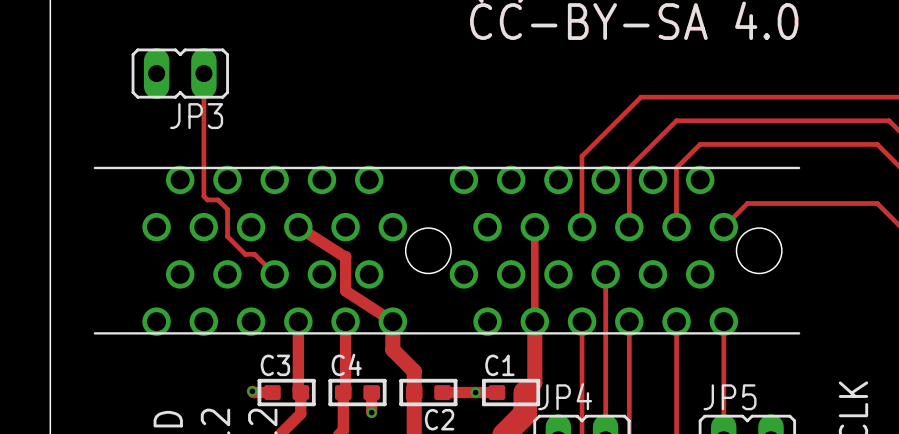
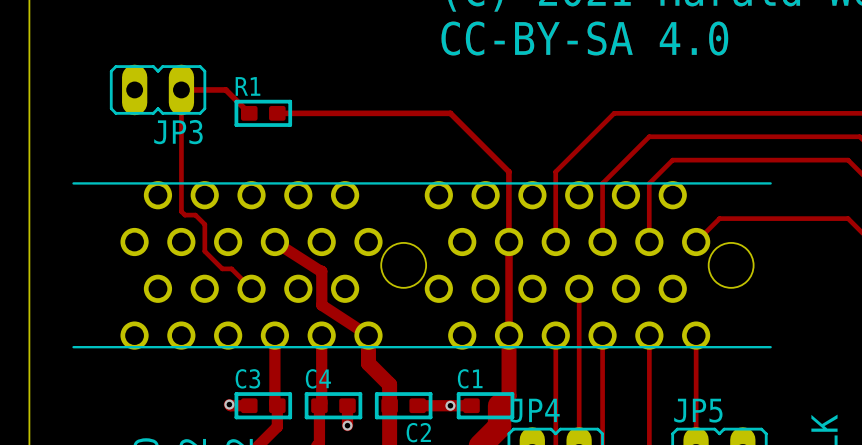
track: none -> (181, 89) (225, 89) (249, 113)
R1: none -> (263, 113)
track: none -> (277, 113) (450, 113) (508, 171) (508, 241)

